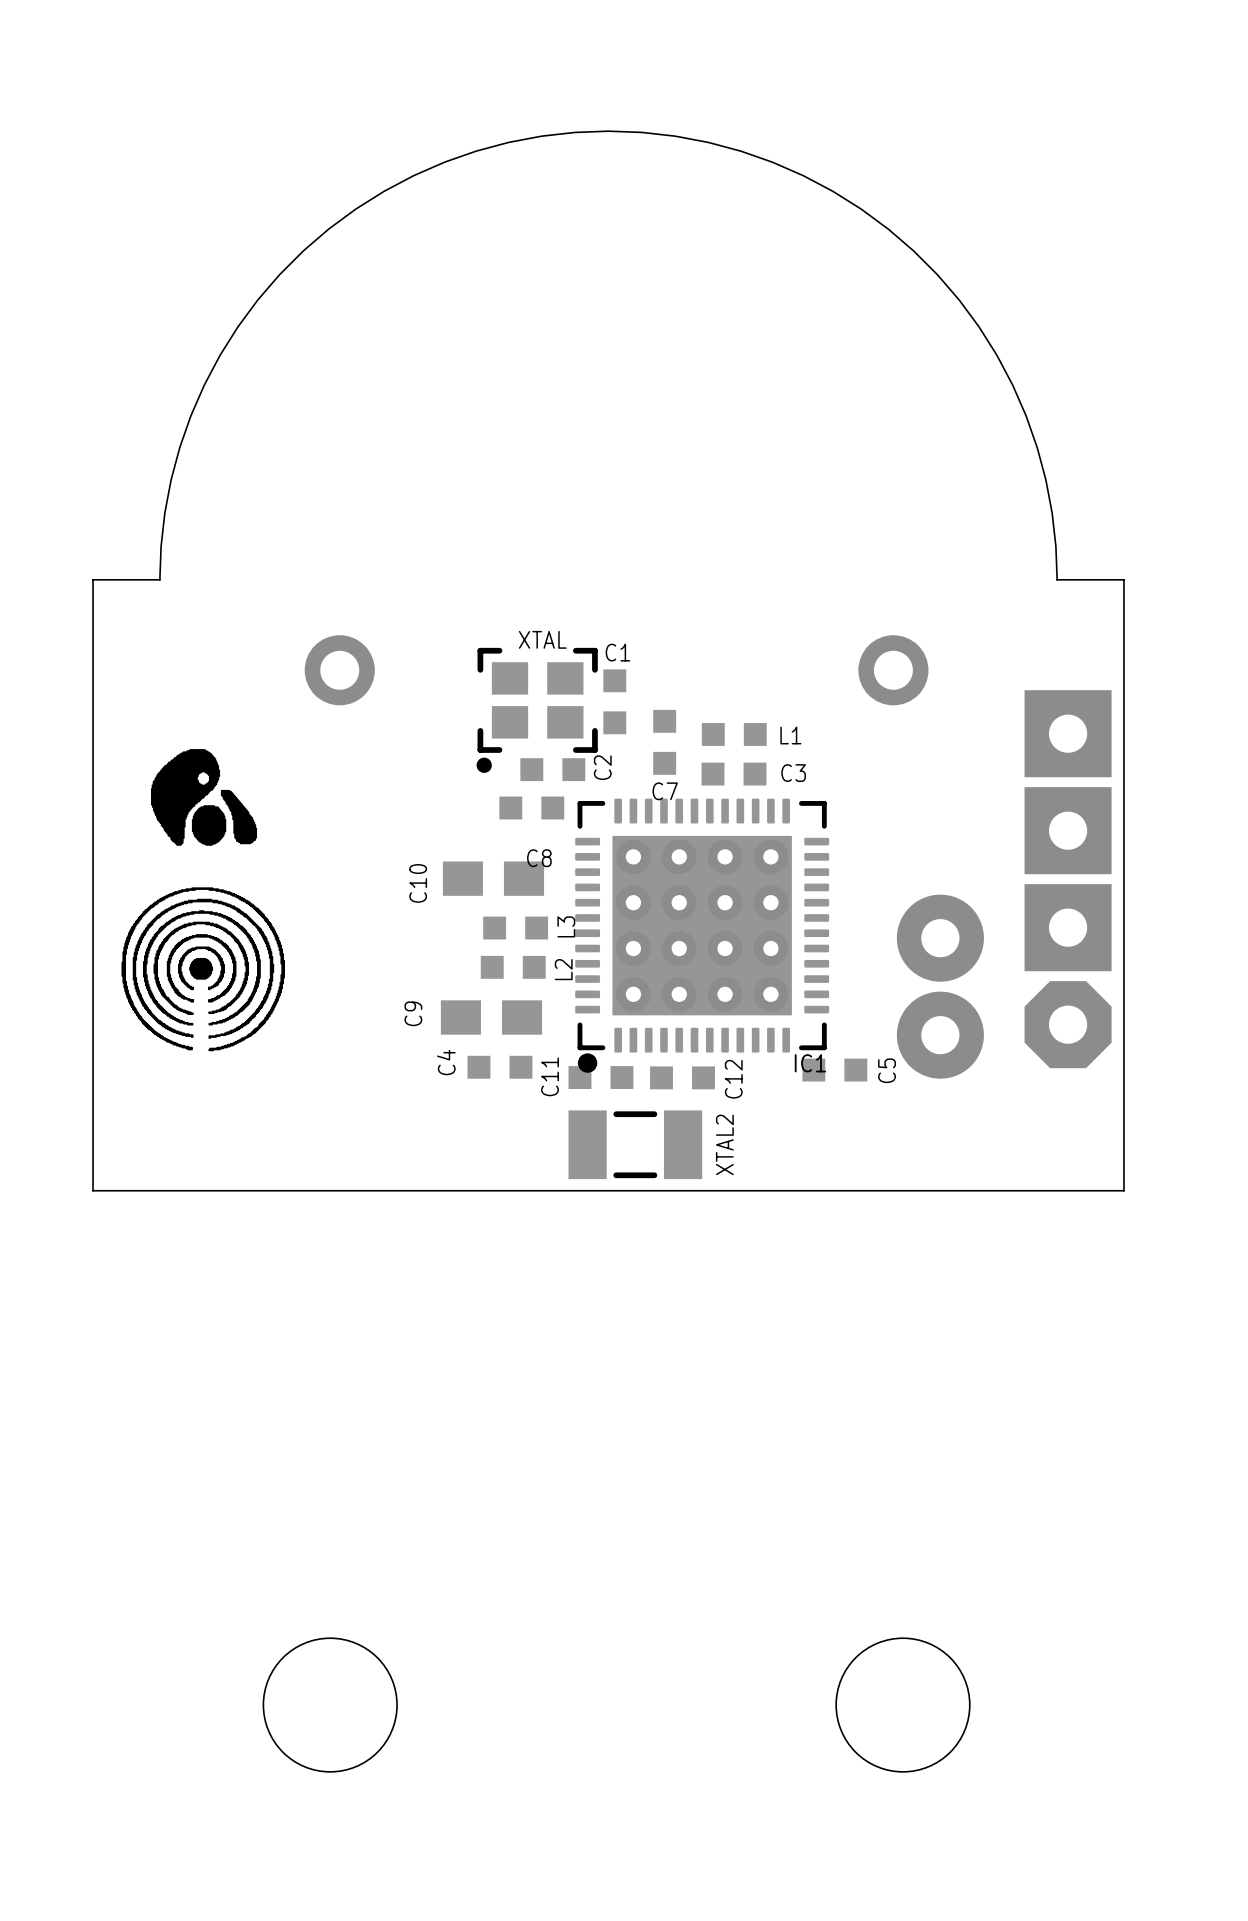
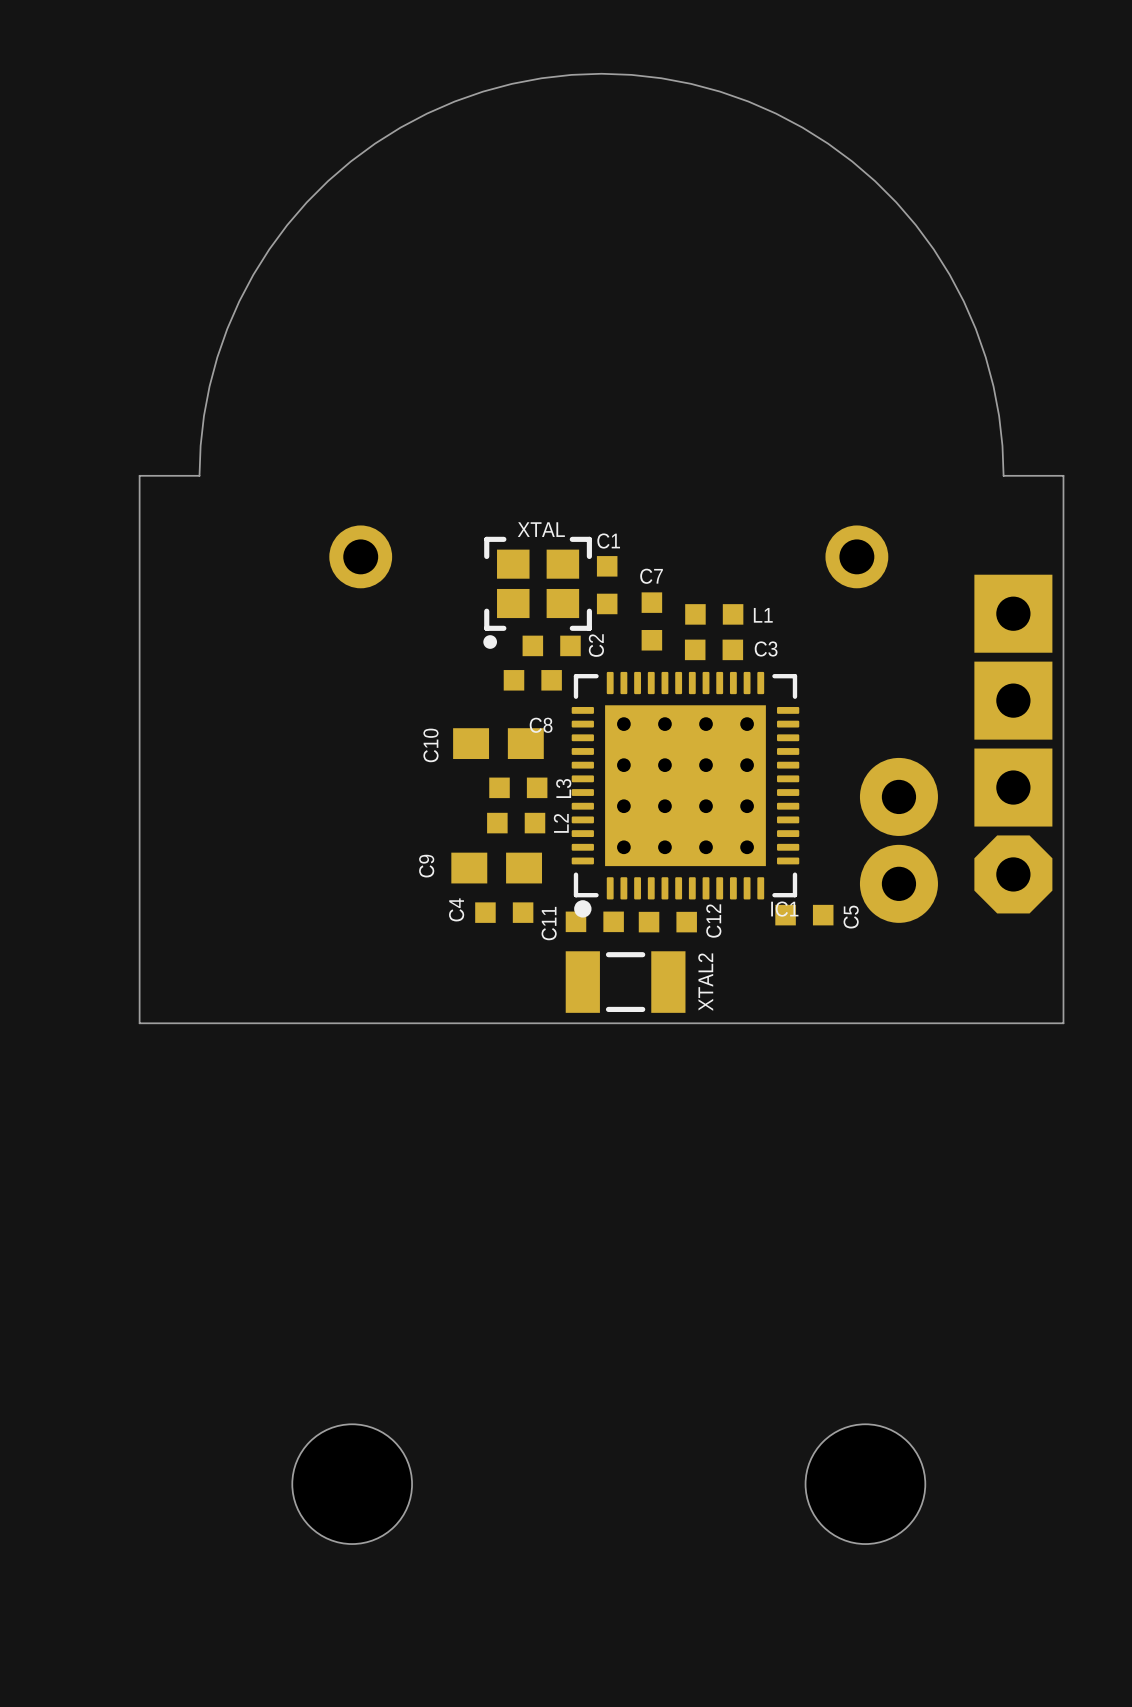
drawing: [121, 749, 285, 1051] -> none
C7 name position: C7 (665, 791) -> C7 (651, 576)

